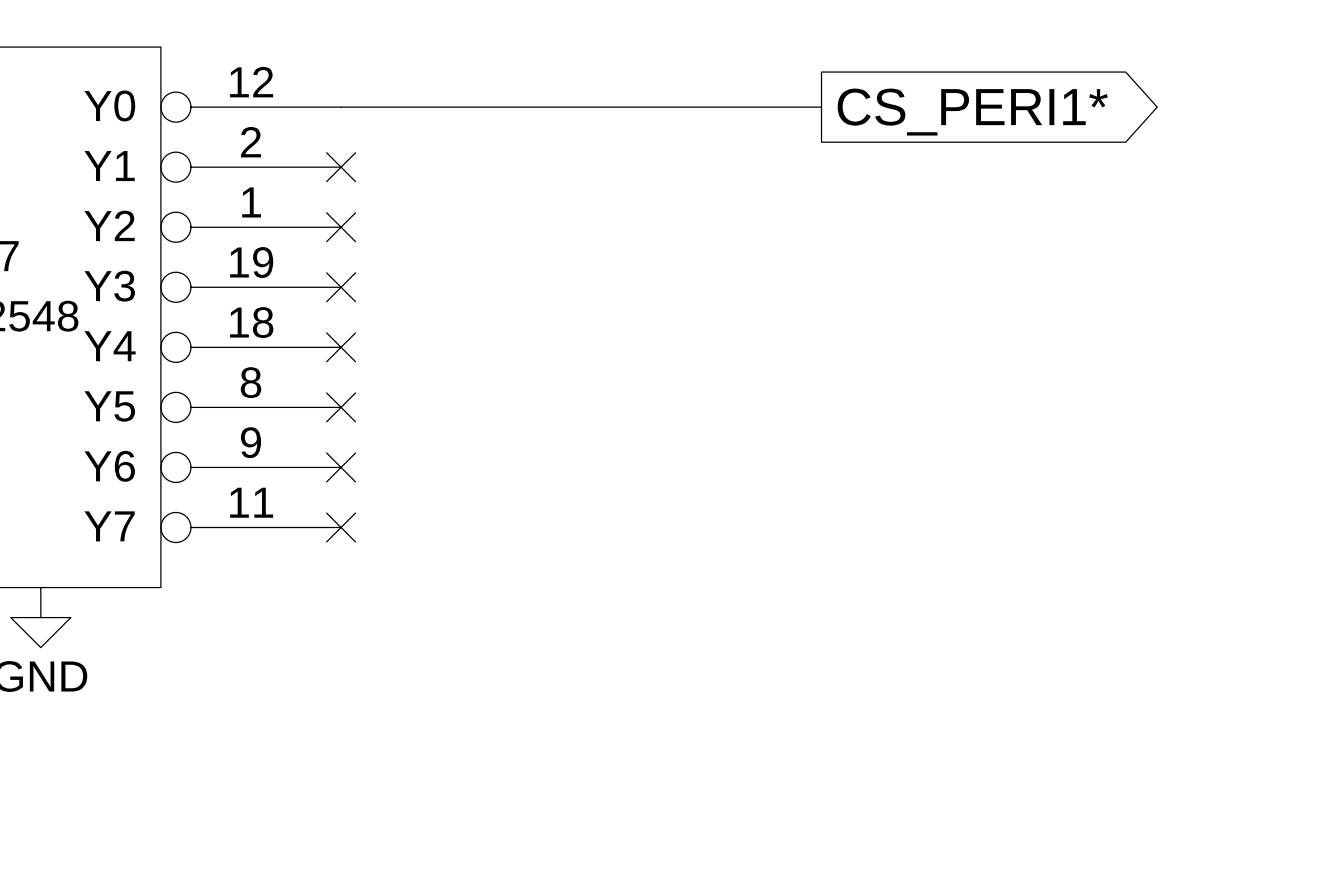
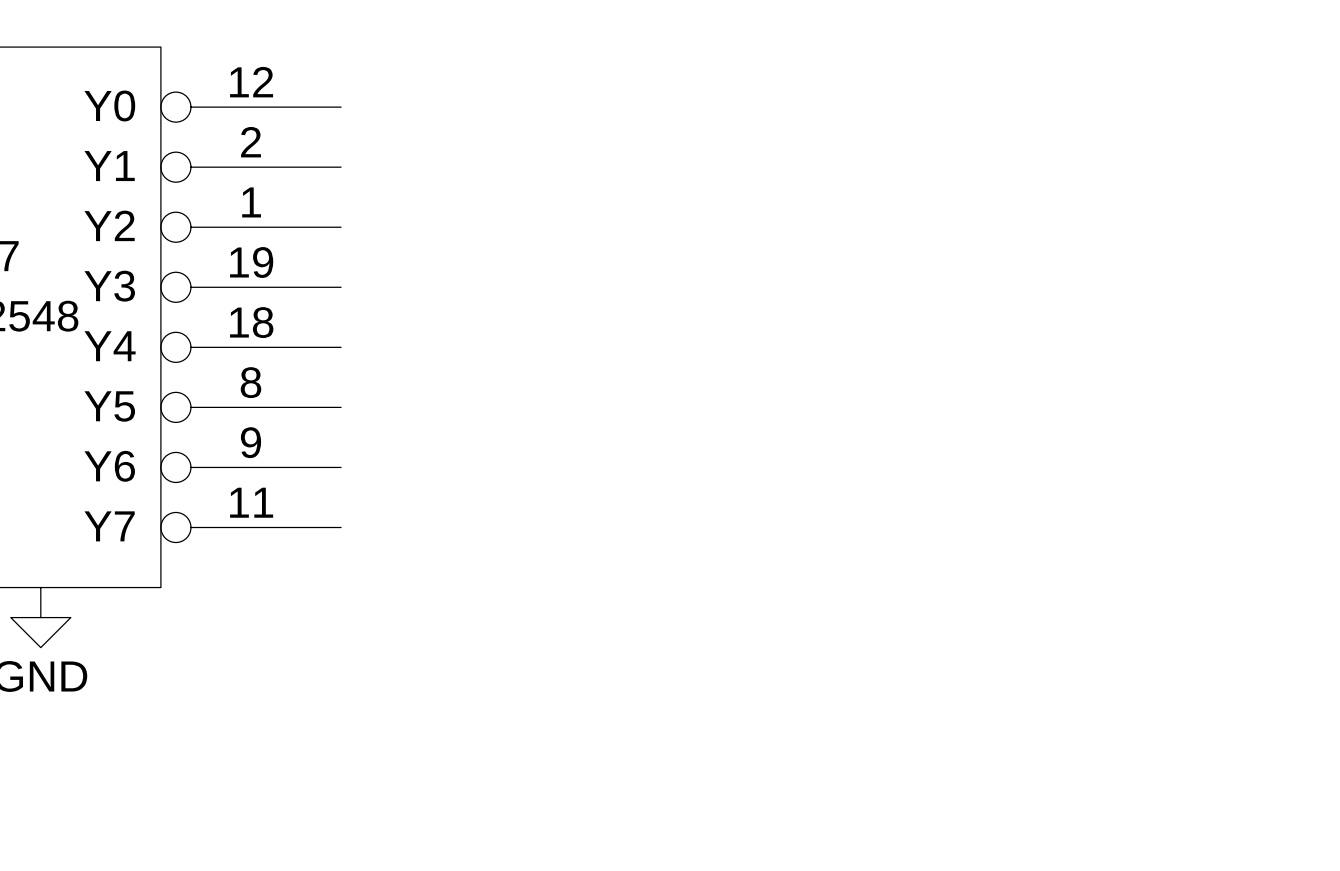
wire: (341, 107) (821, 107) -> none
global label: CS_PERI1* (972, 112) -> none
no-connect mark: (341, 167) -> none
no-connect mark: (341, 227) -> none
no-connect mark: (341, 287) -> none
no-connect mark: (341, 347) -> none
no-connect mark: (341, 407) -> none
no-connect mark: (341, 467) -> none
no-connect mark: (341, 527) -> none

